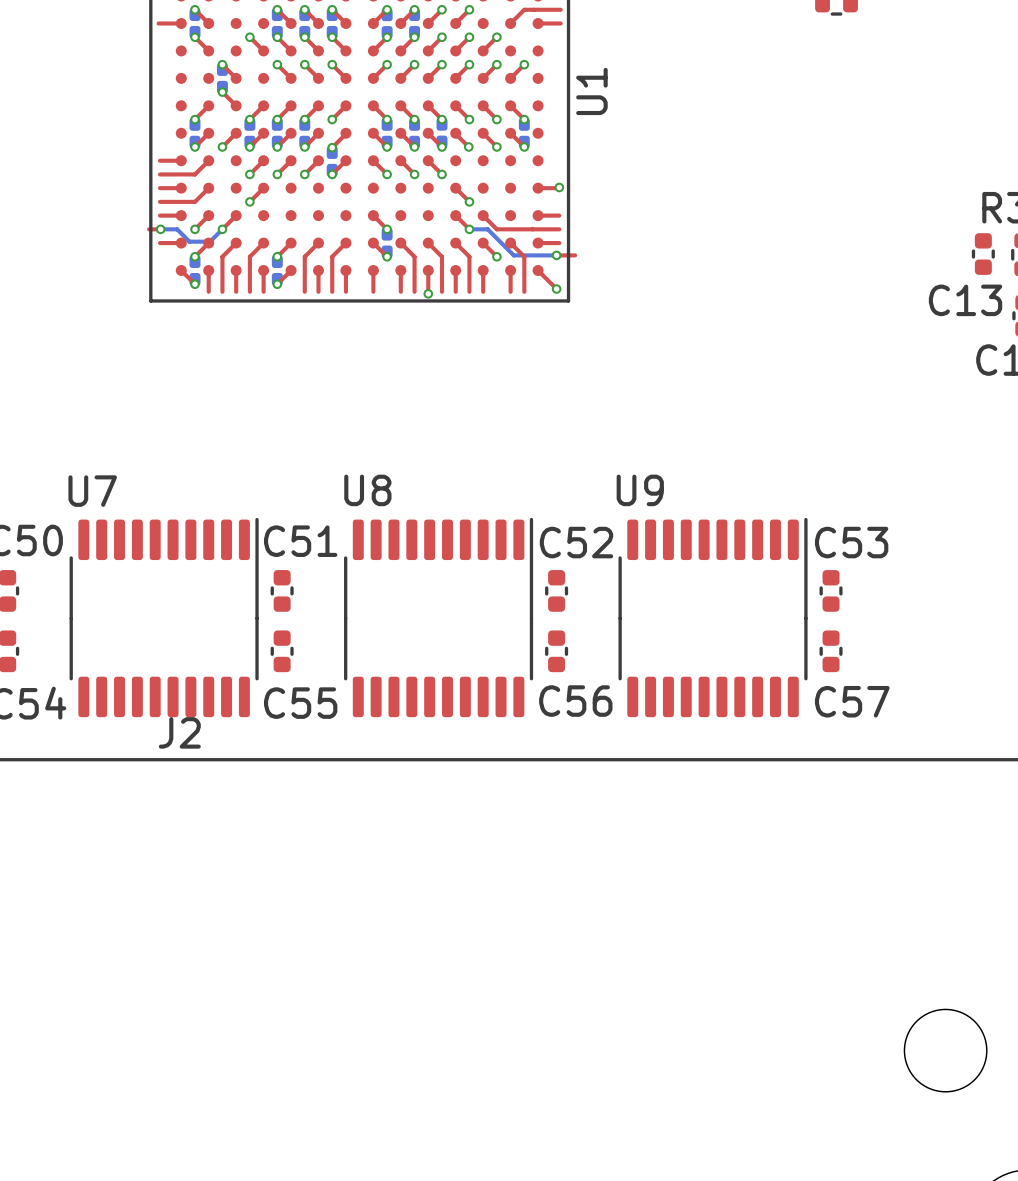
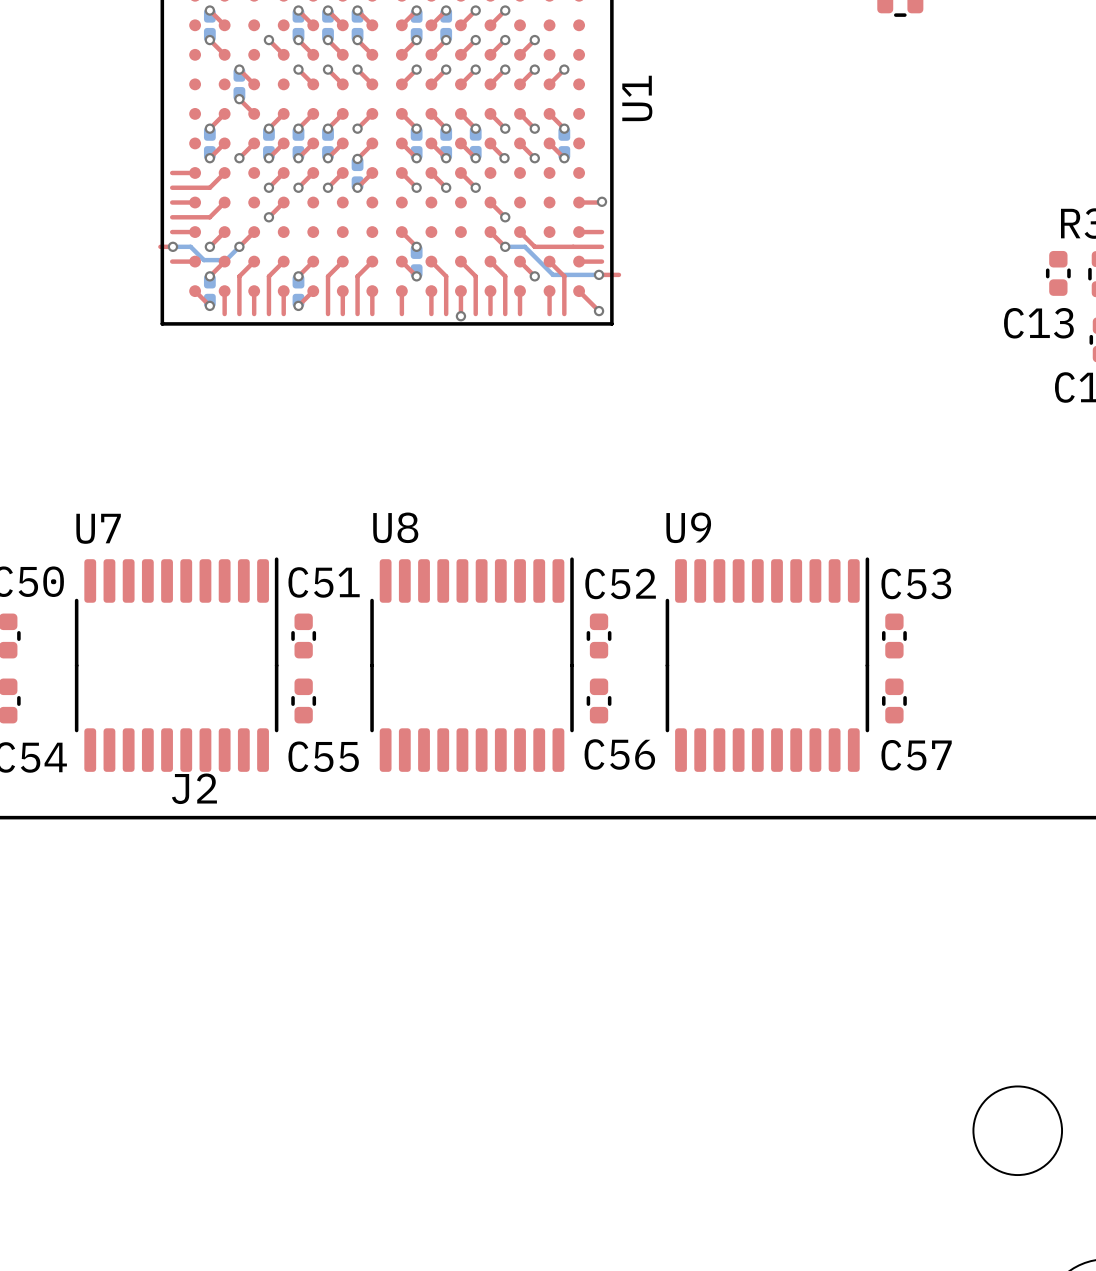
top track: (560, 9) (524, 9) (510, 23) -> none
top track: (158, 23) (181, 23) -> none
top track: (538, 23) (560, 23) -> none

